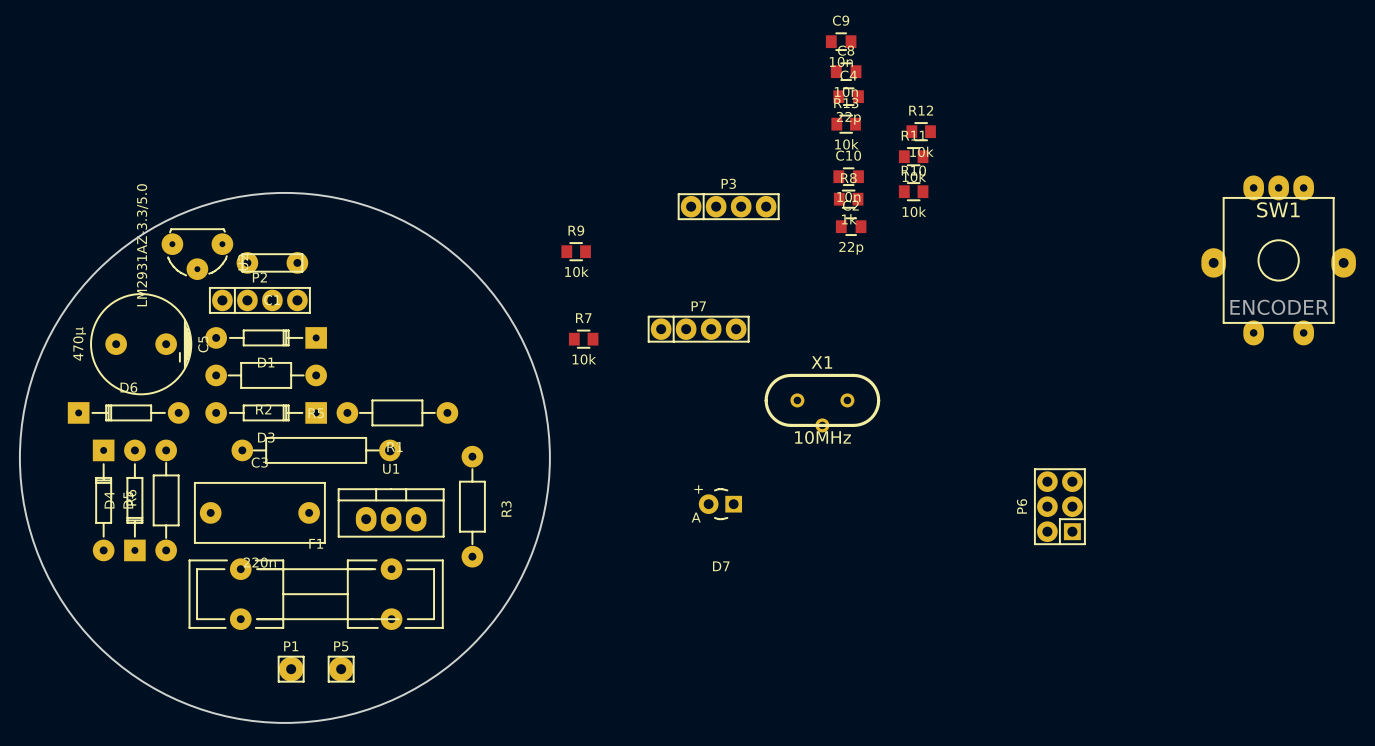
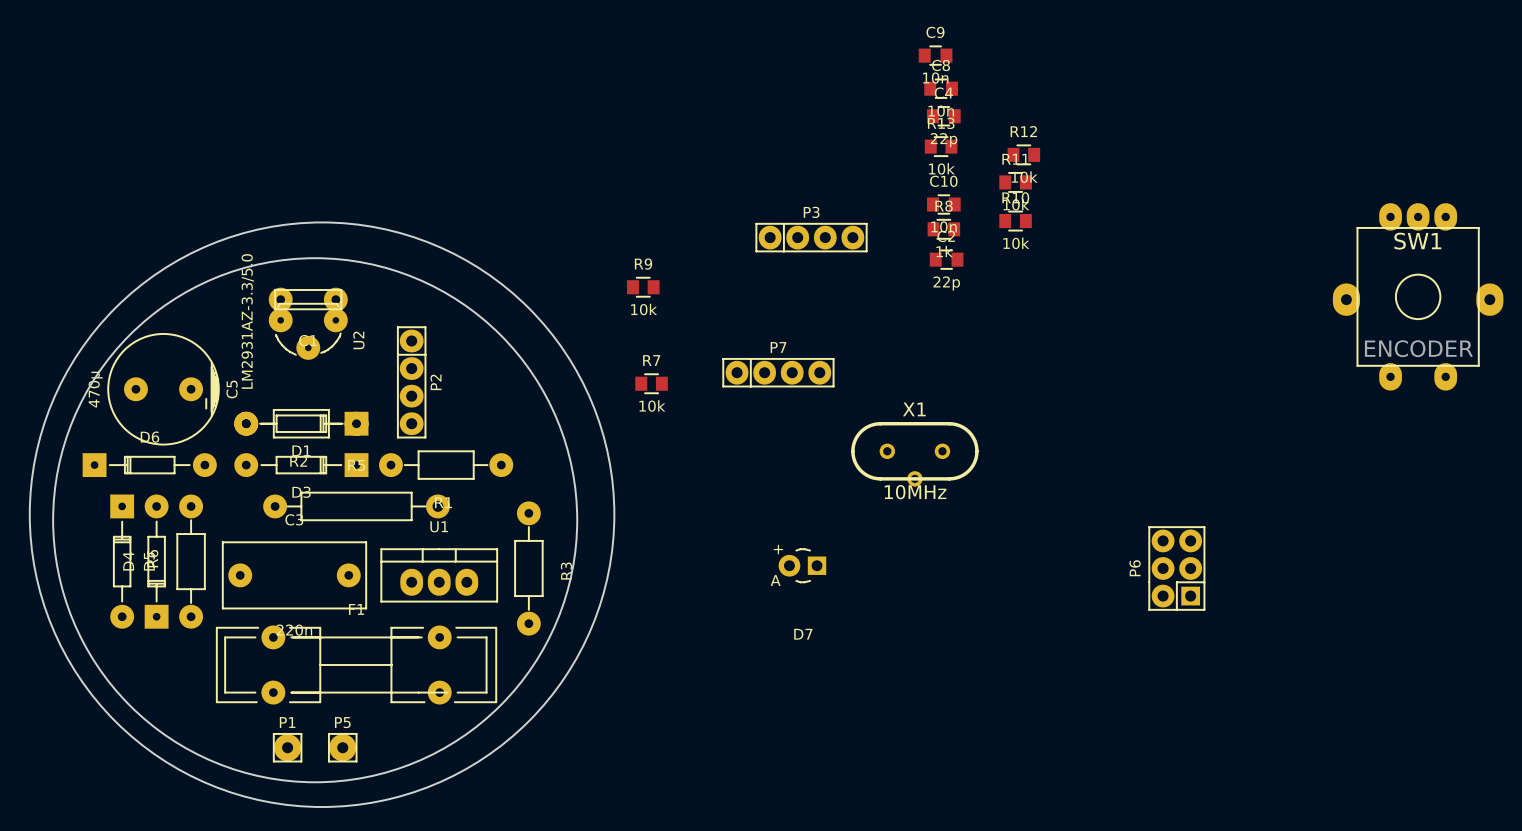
round board edge: none -> [52, 257, 579, 784]
U2 position: (197, 254) -> (308, 331)
P2 rotation: 0° (259, 300) -> 90° clockwise (411, 382)
P2 position: (259, 300) -> (411, 382)
D1 position: (266, 337) -> (301, 423)
P1 position: (291, 669) -> (287, 747)
P5 position: (341, 669) -> (342, 747)

